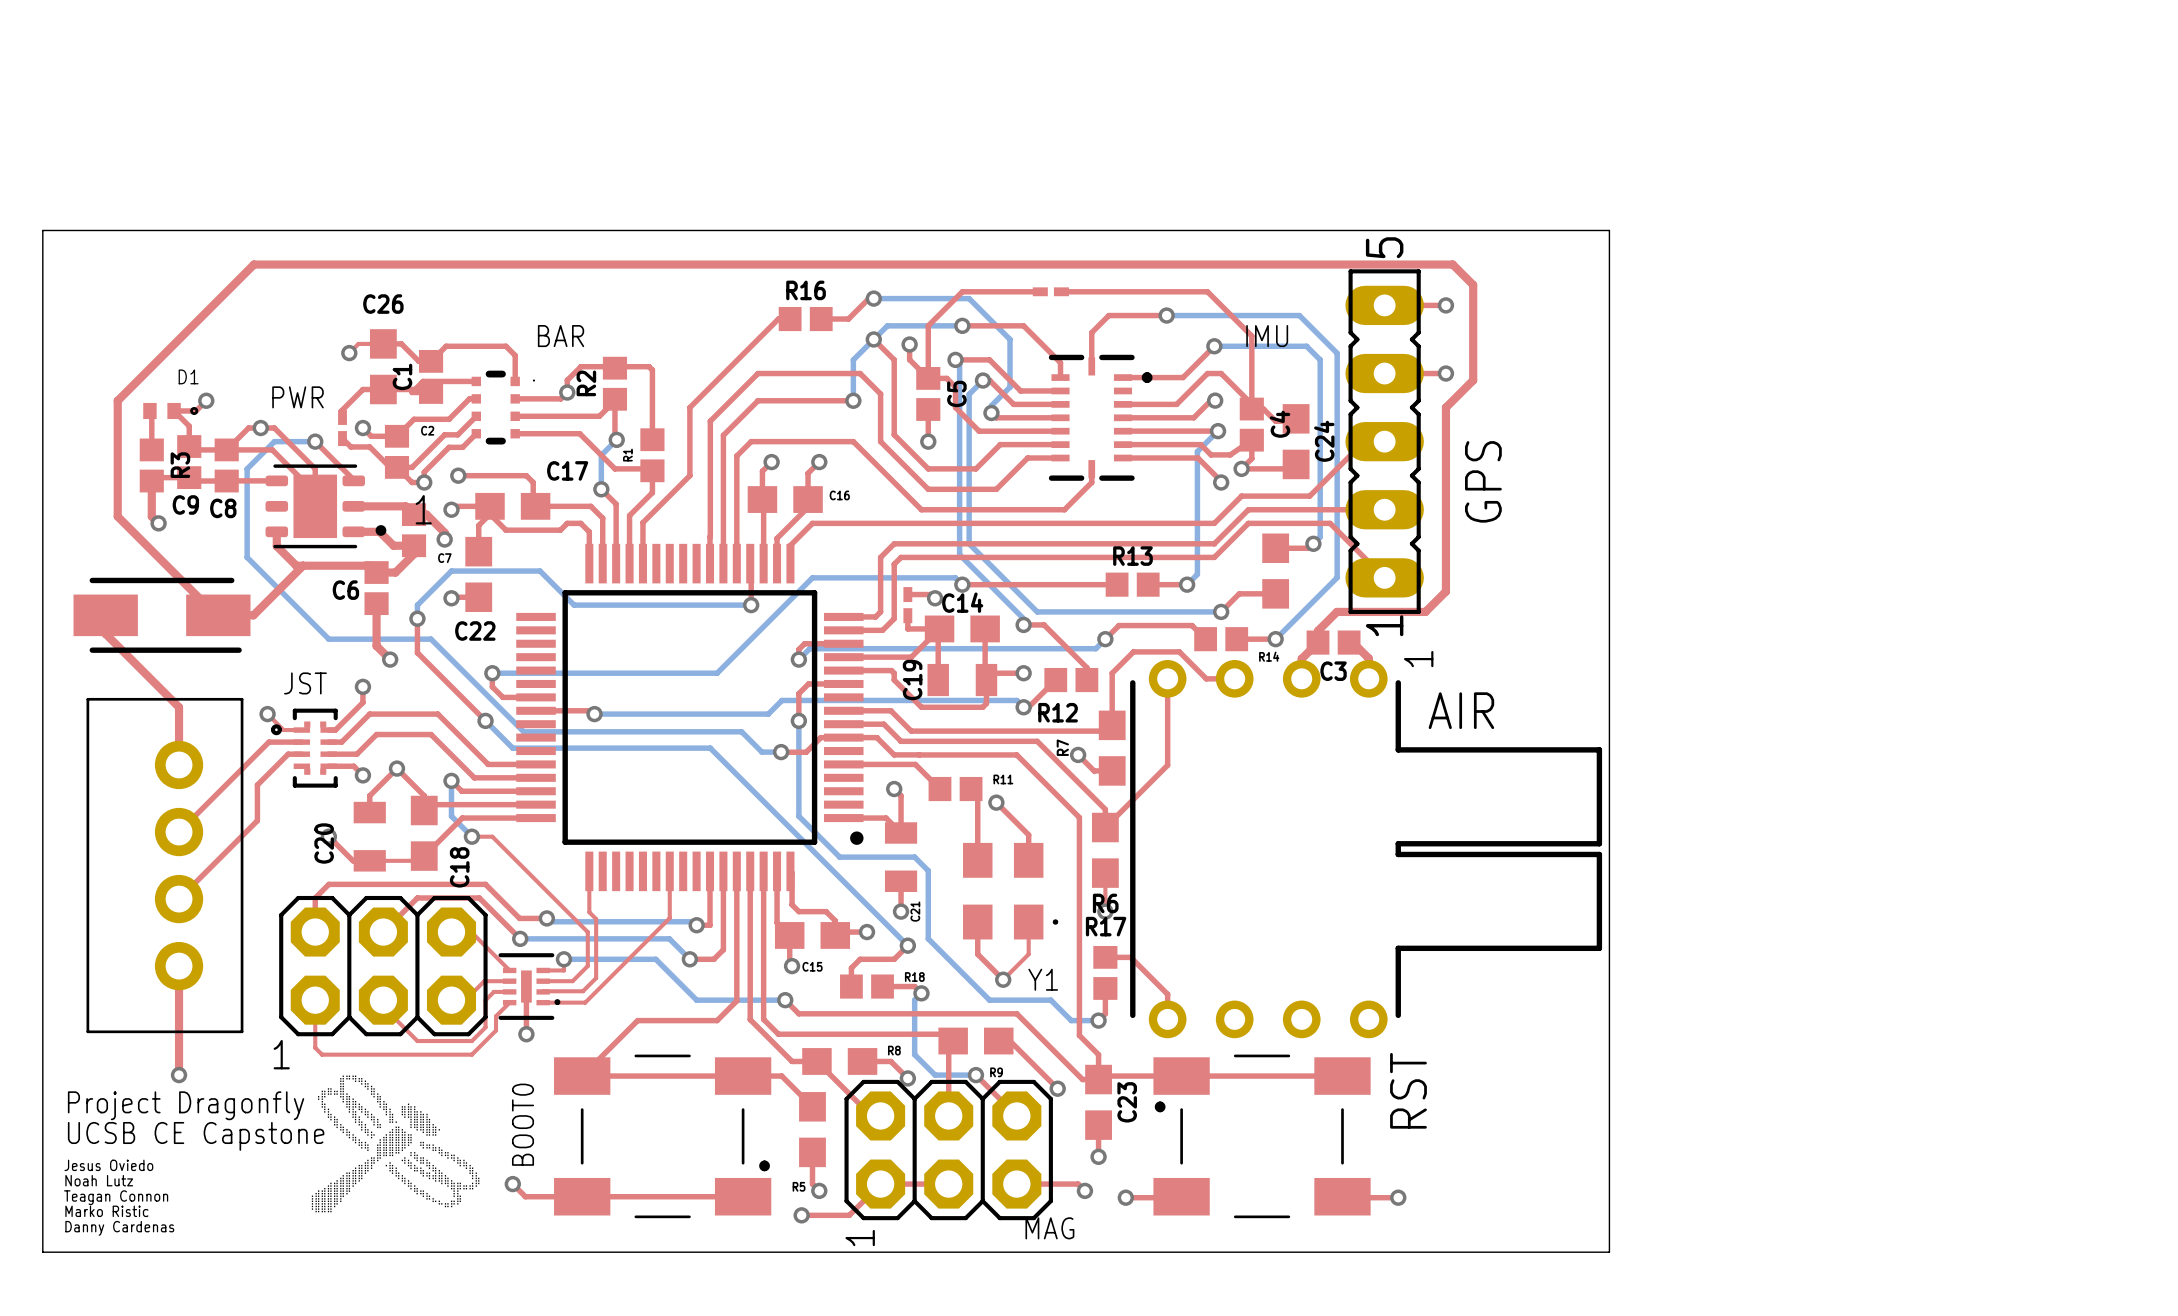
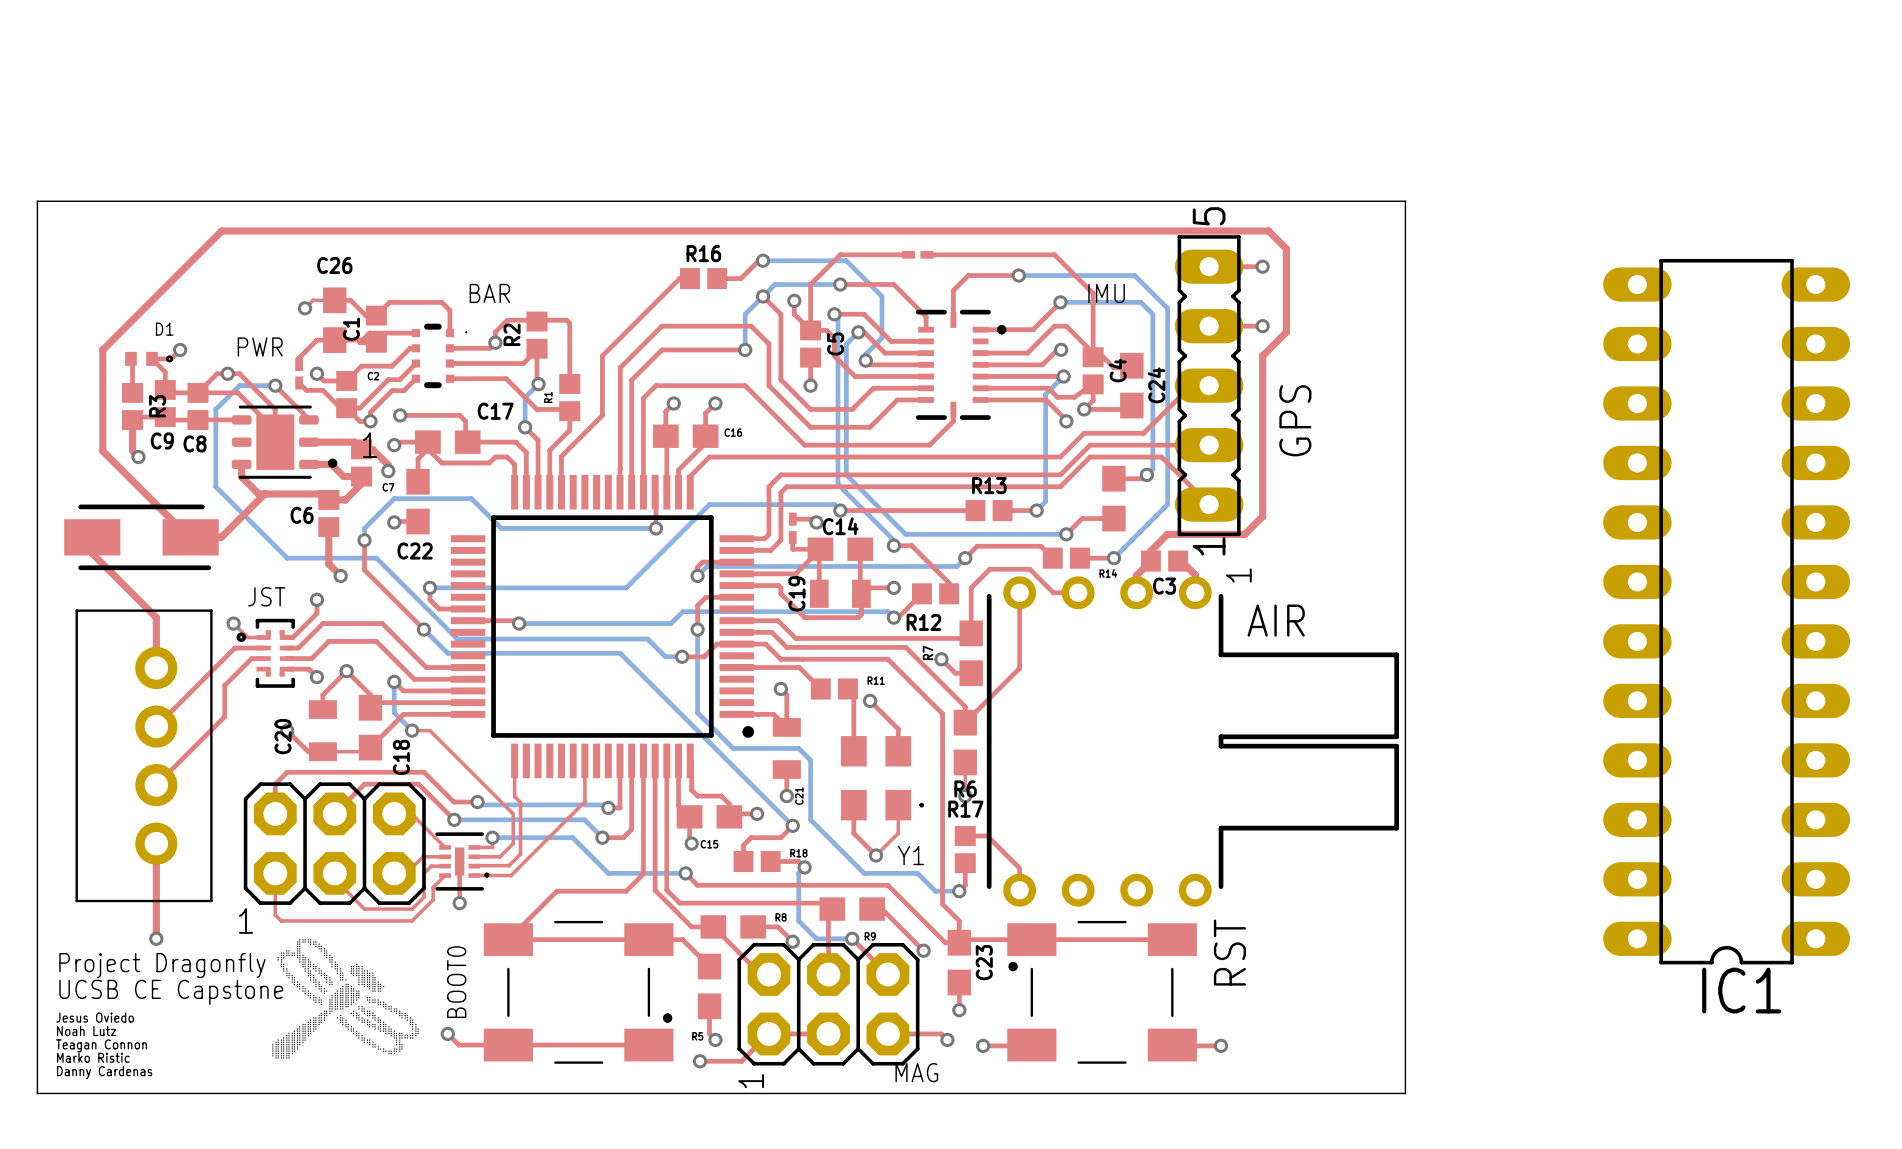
IC1: none -> (1726, 611)

